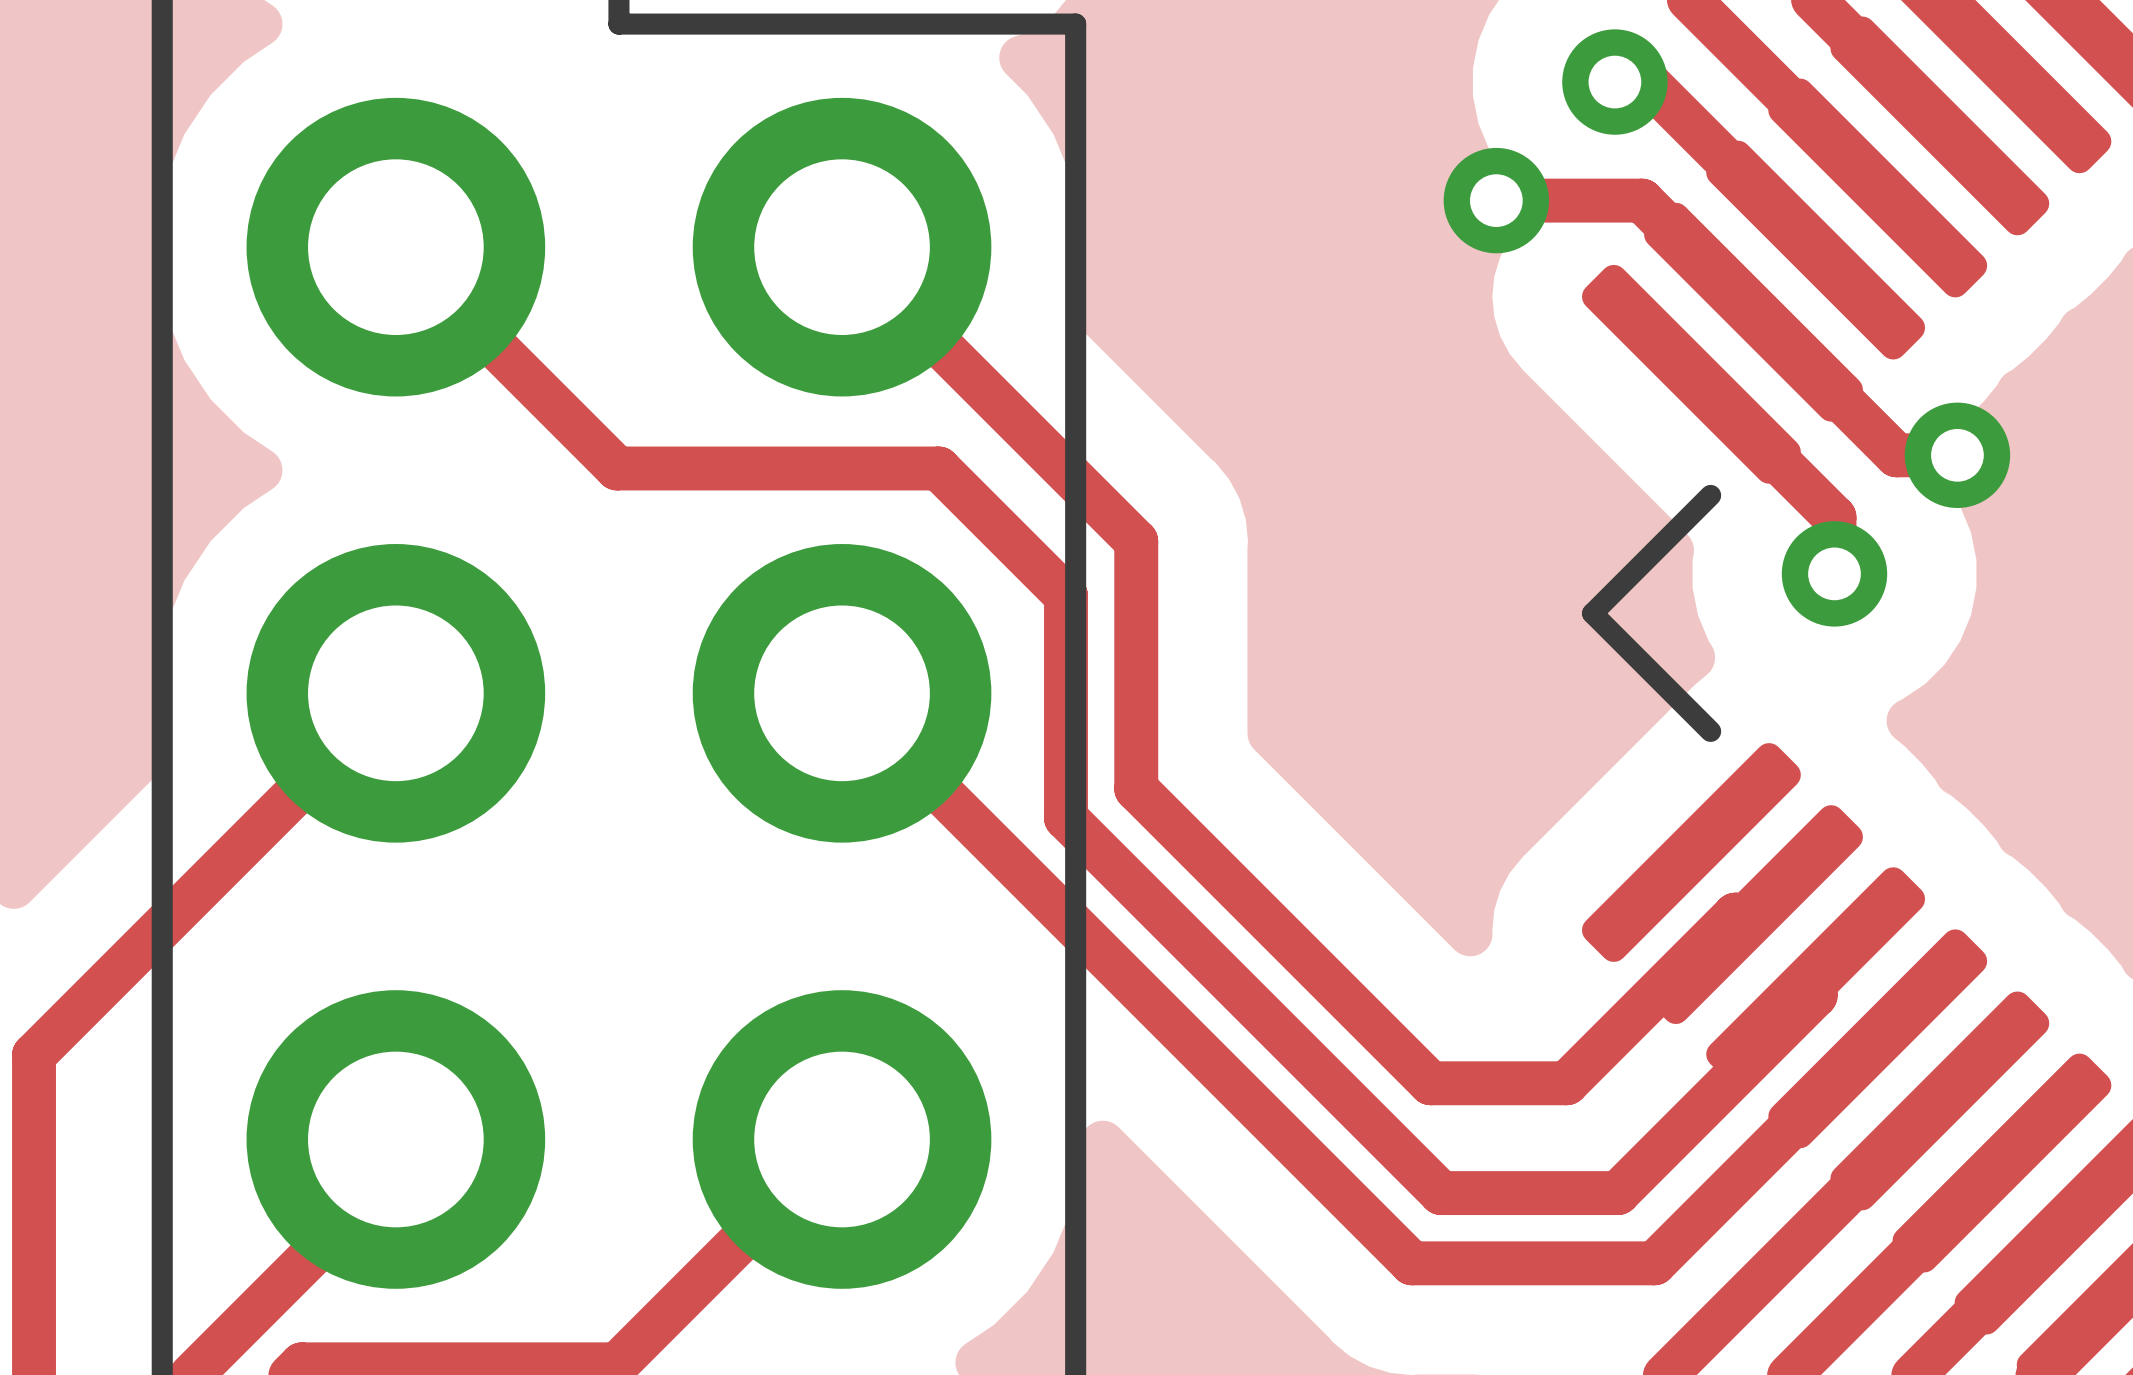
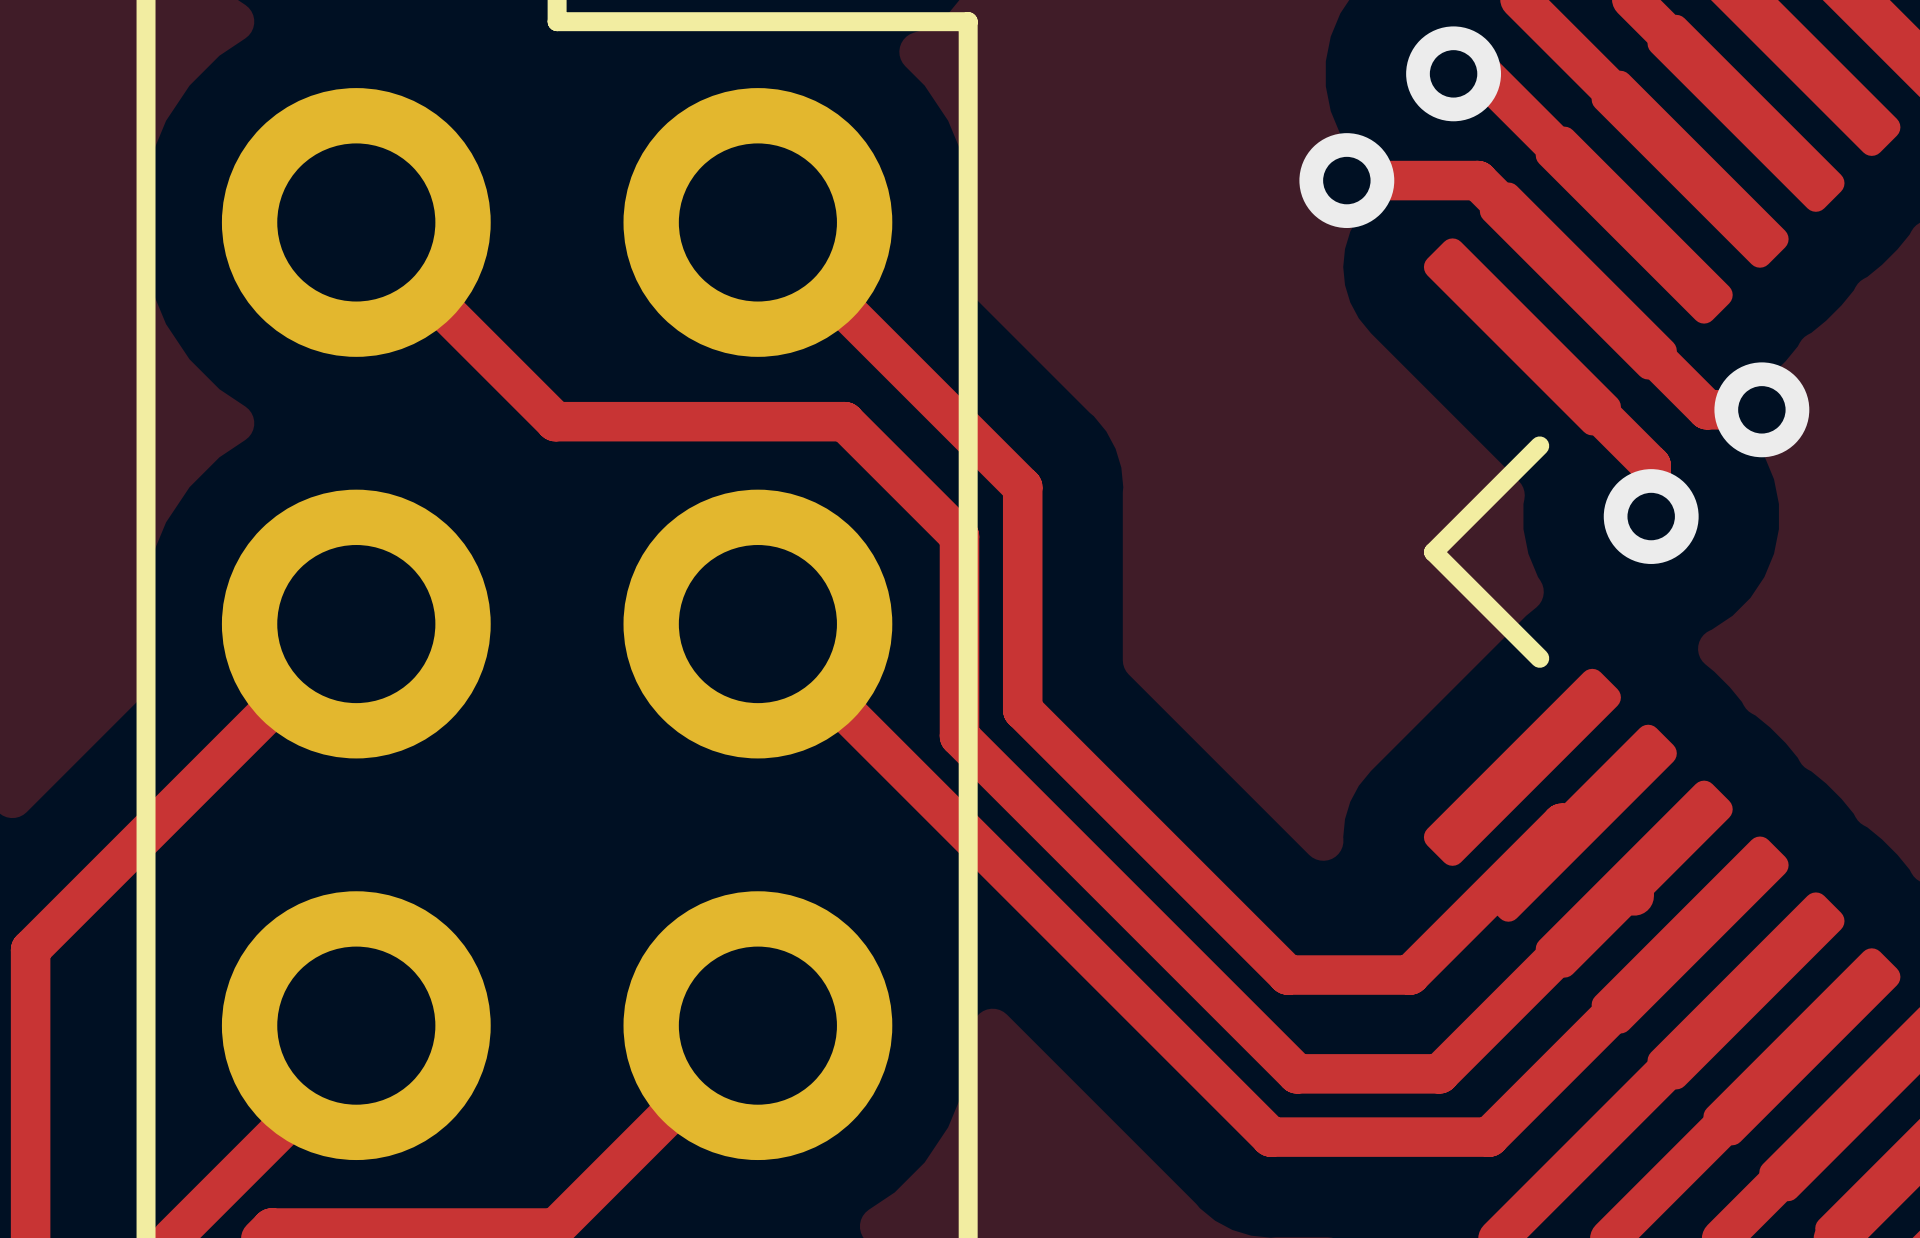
track: (1815, 995) (1617, 1193) (1599, 1193) -> (1634, 879) (1439, 1073)

